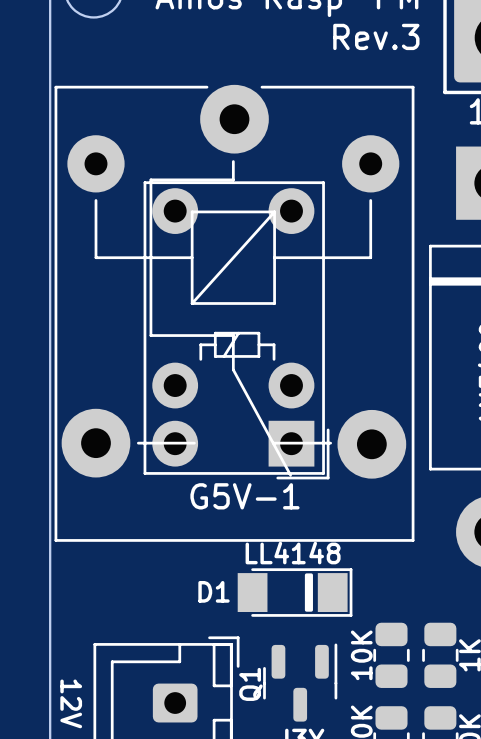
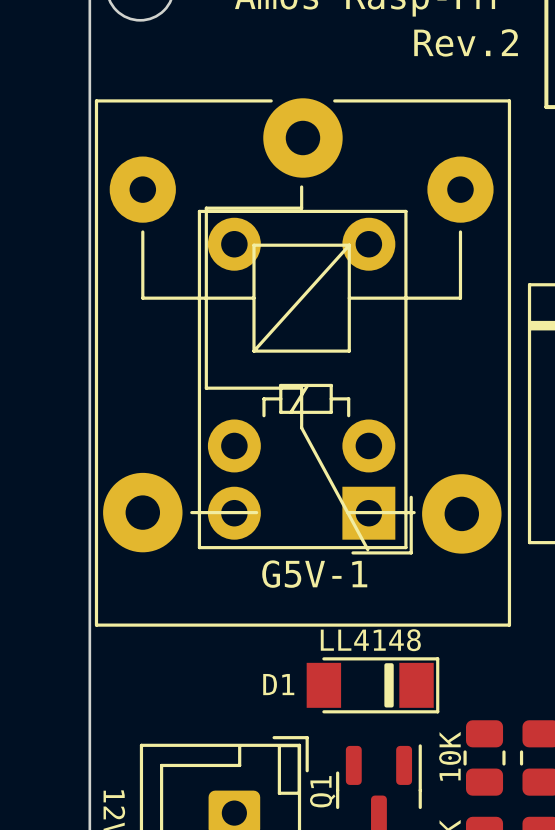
text: Rev.3 (376, 36) -> Rev.2 (466, 42)

